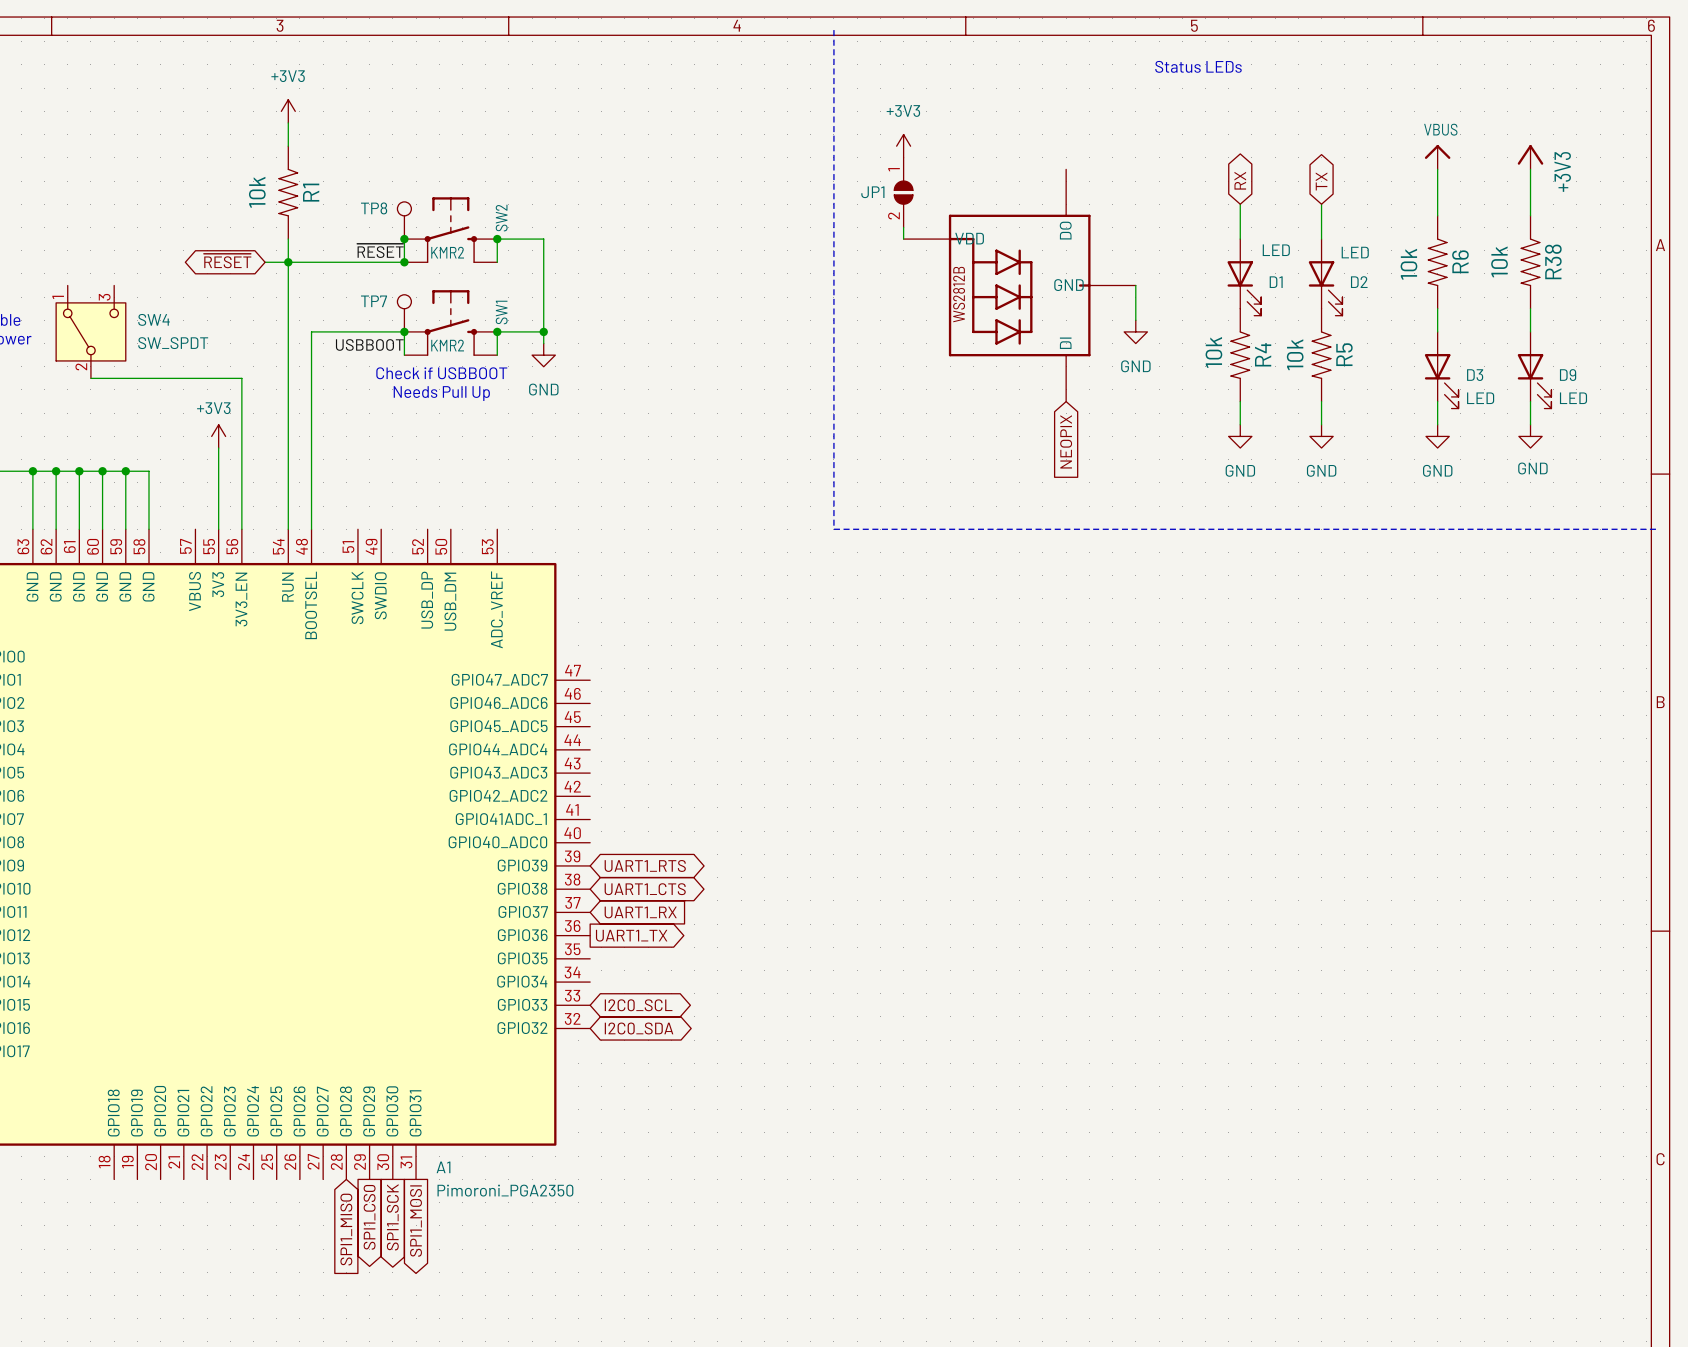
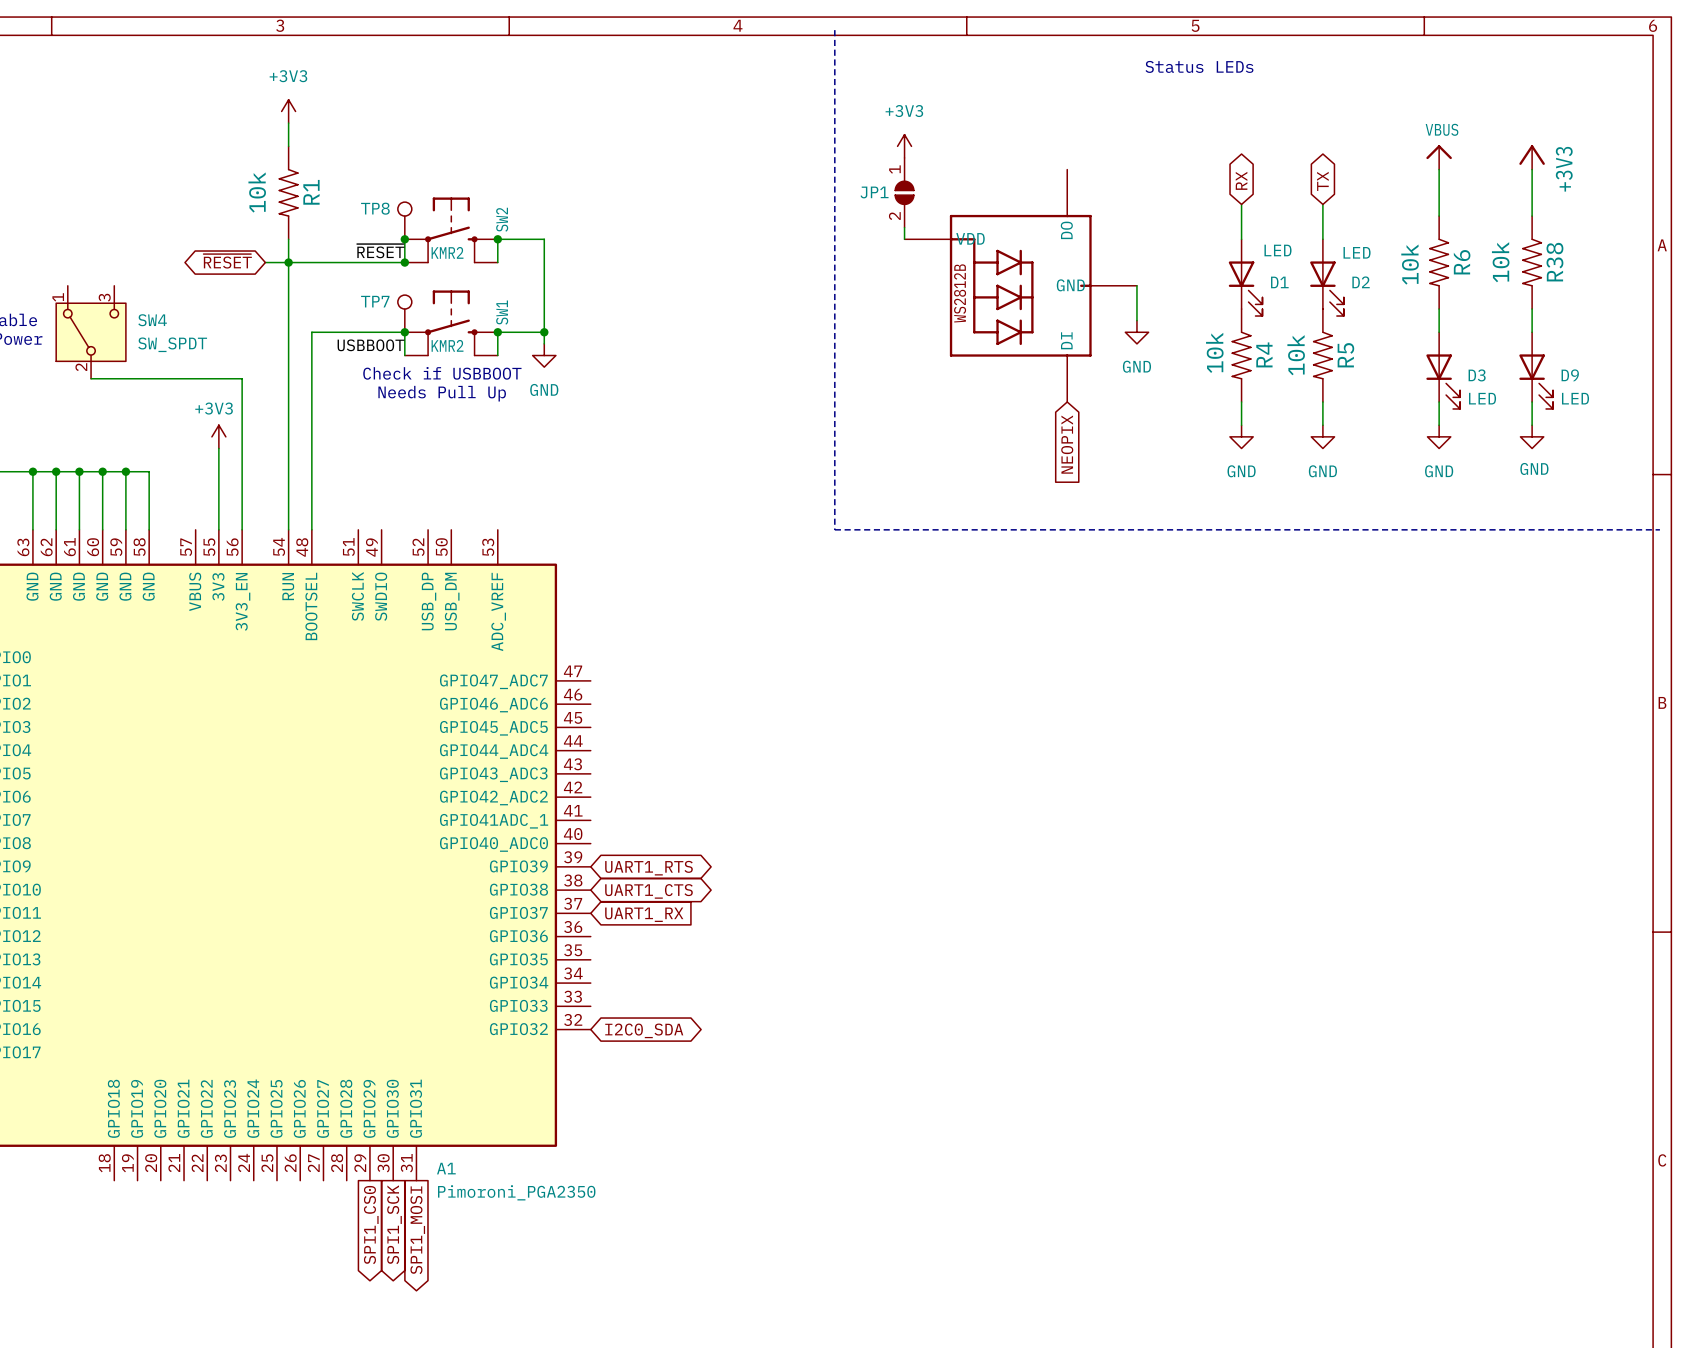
global label: UART1_TX (631, 935) -> none
global label: I2C0_SCL (638, 1005) -> none
global label: SPI1_MISO (346, 1229) -> none

